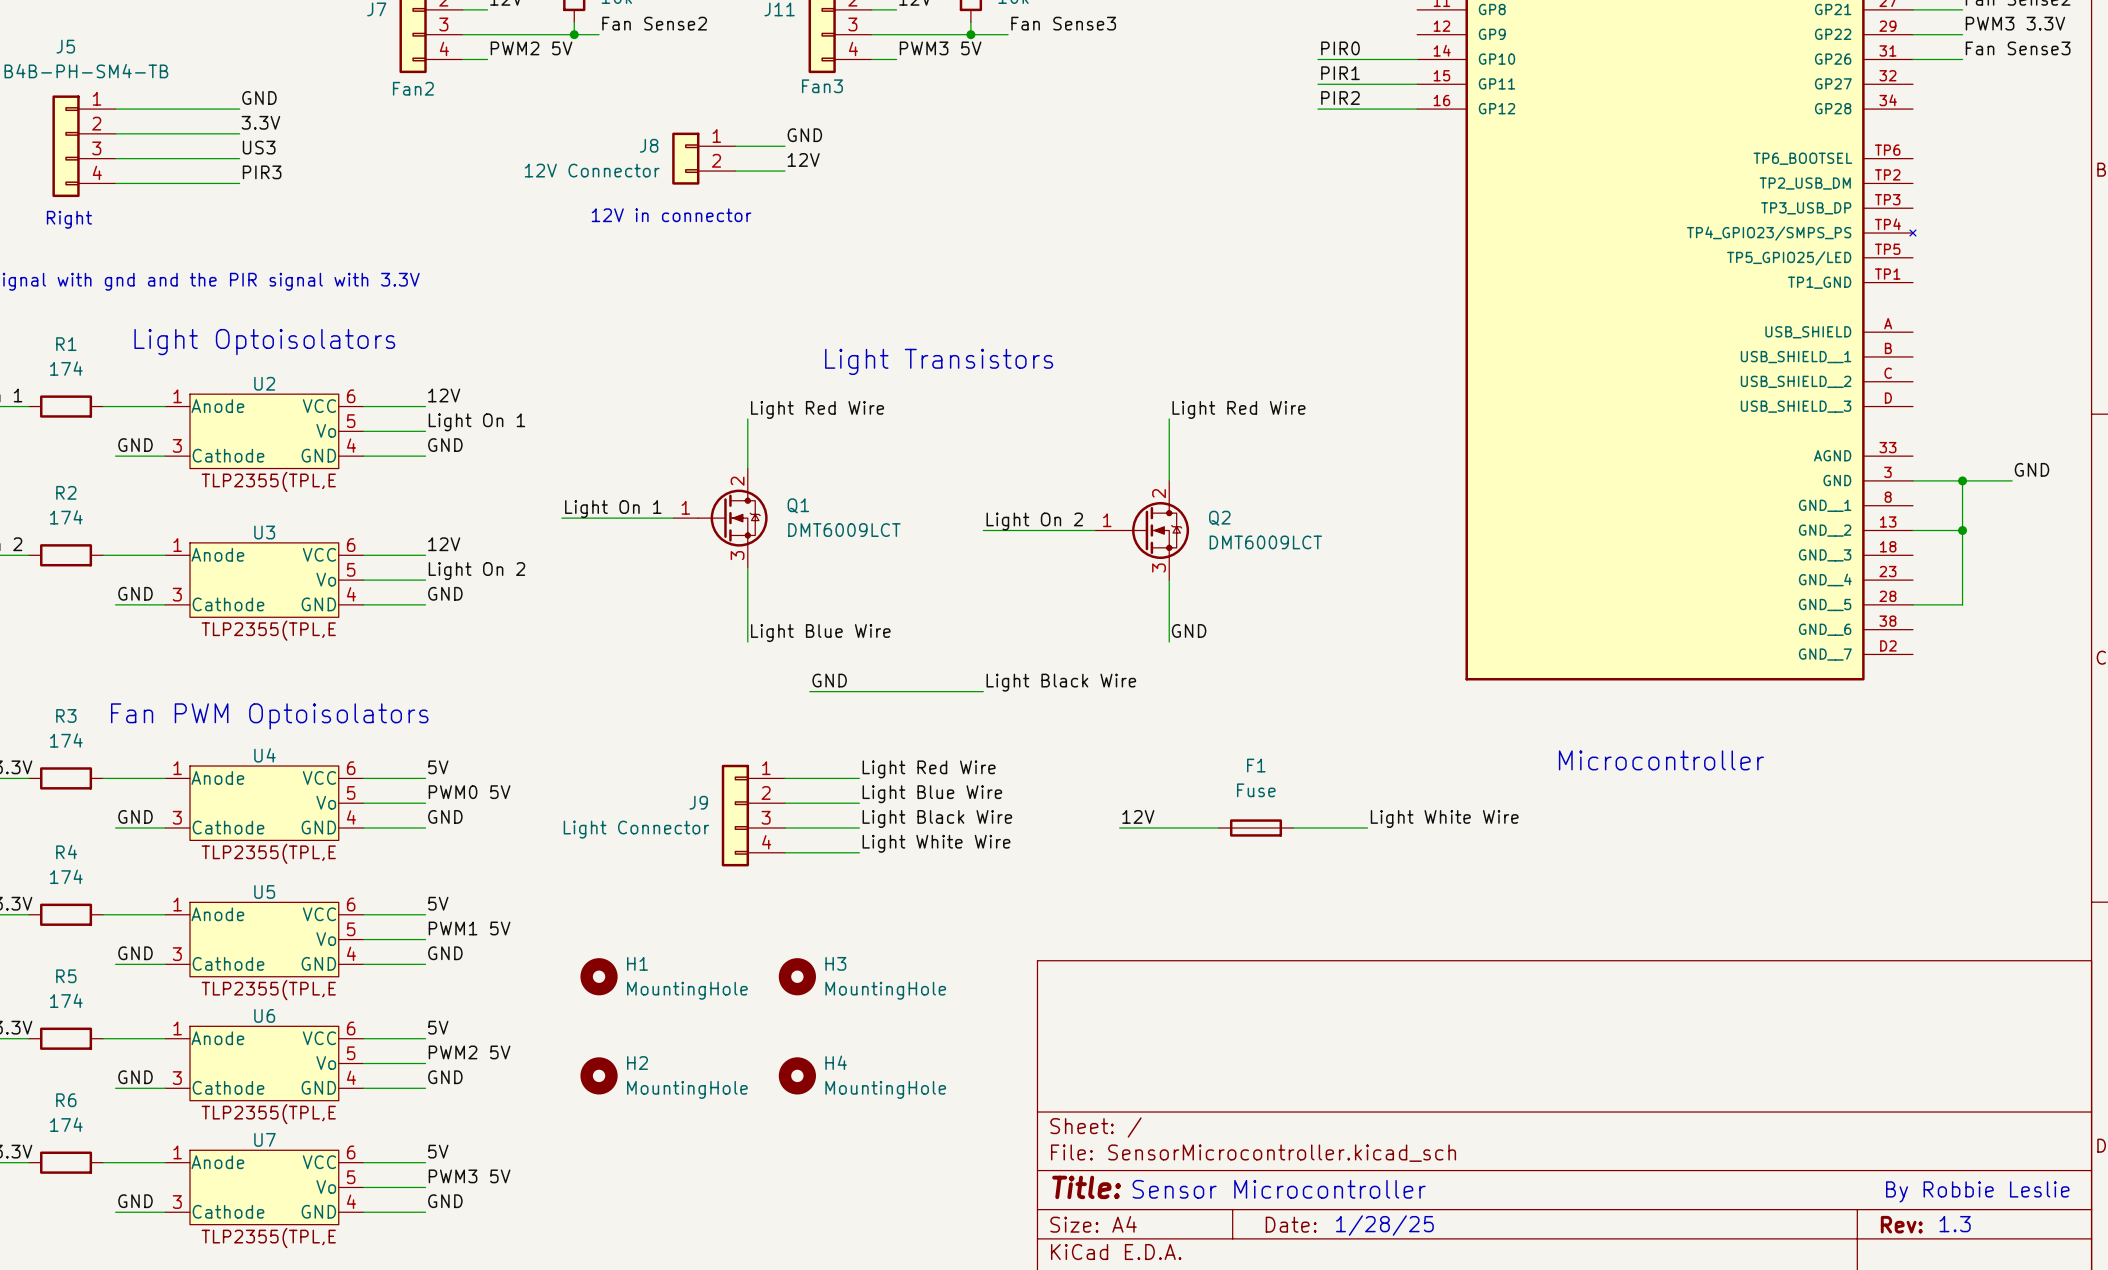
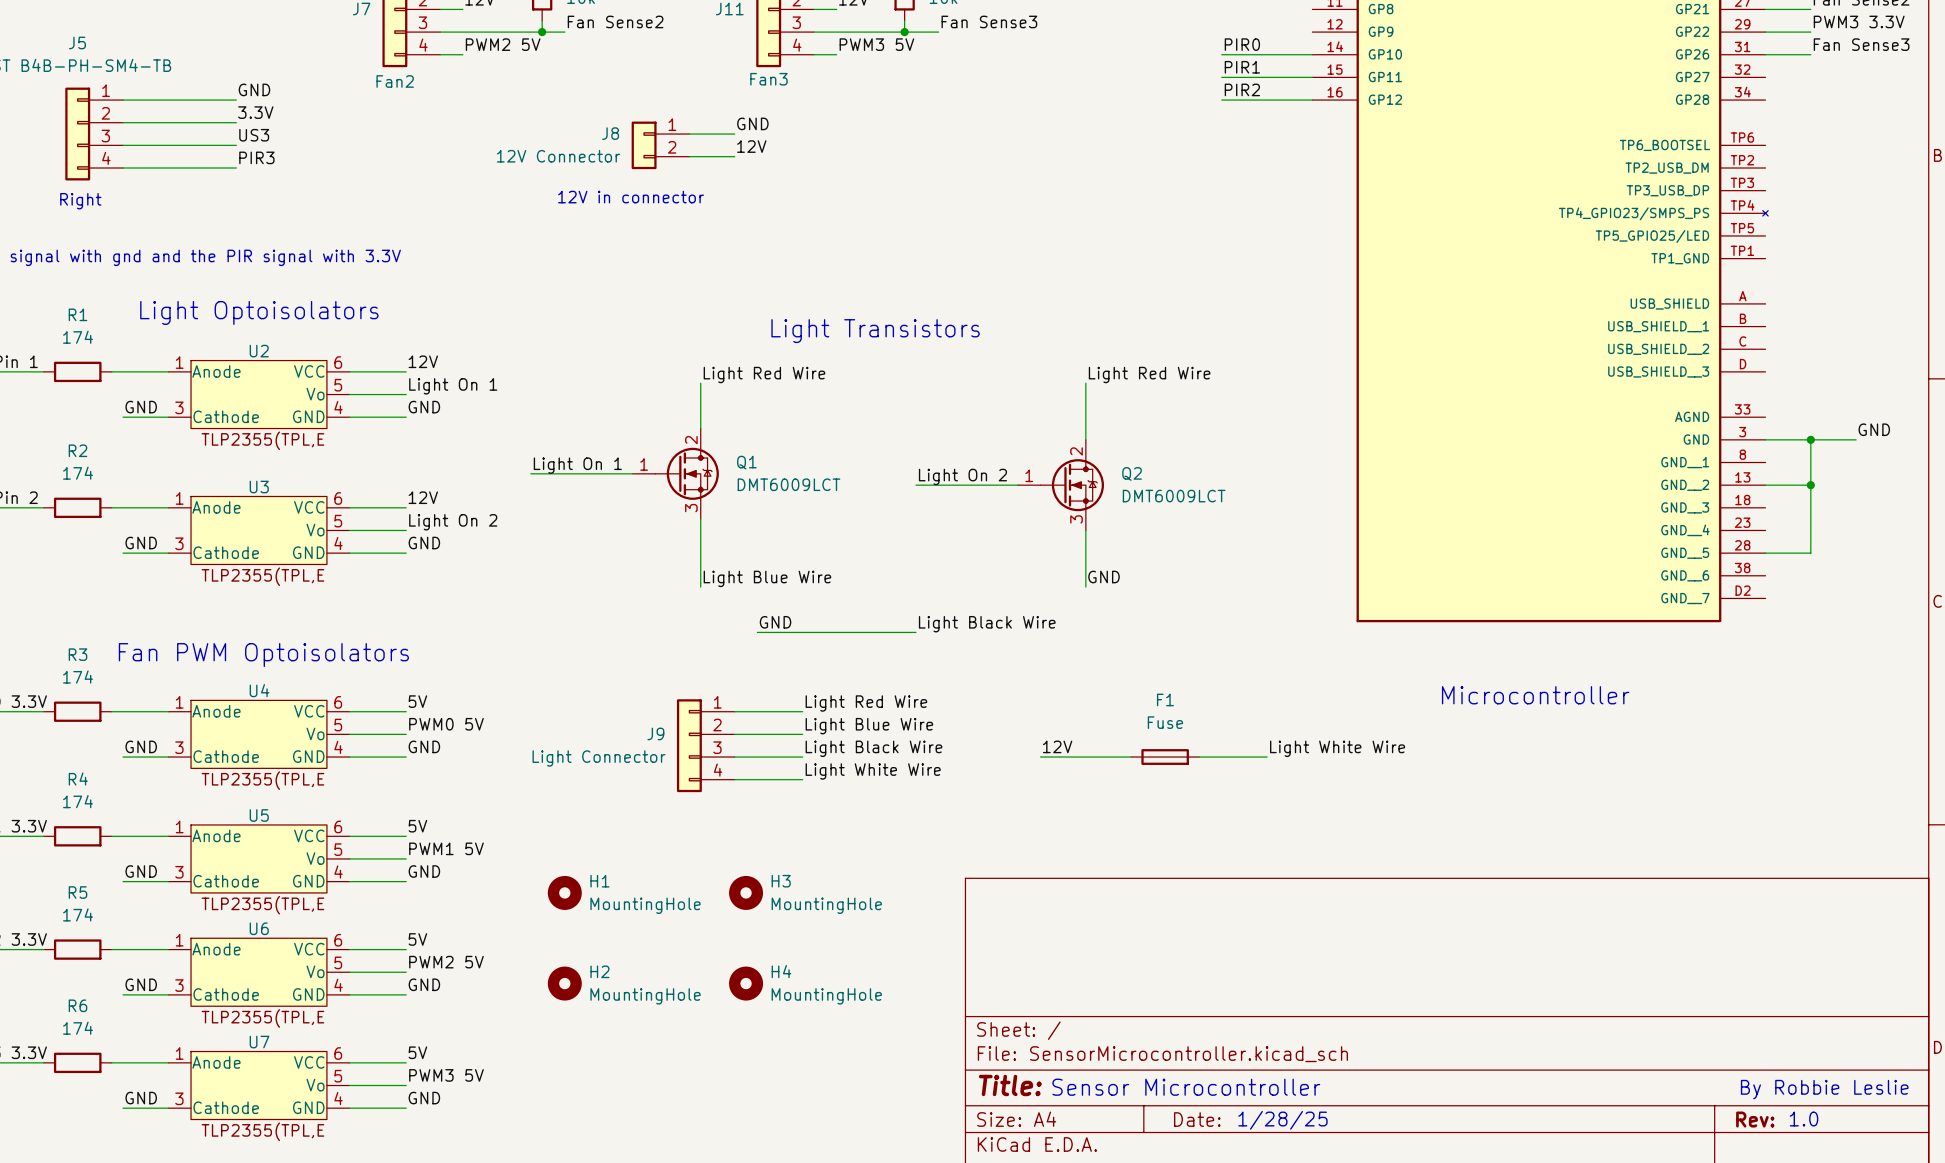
text: 1.3 (1955, 1224) -> 1.0 (1804, 1119)

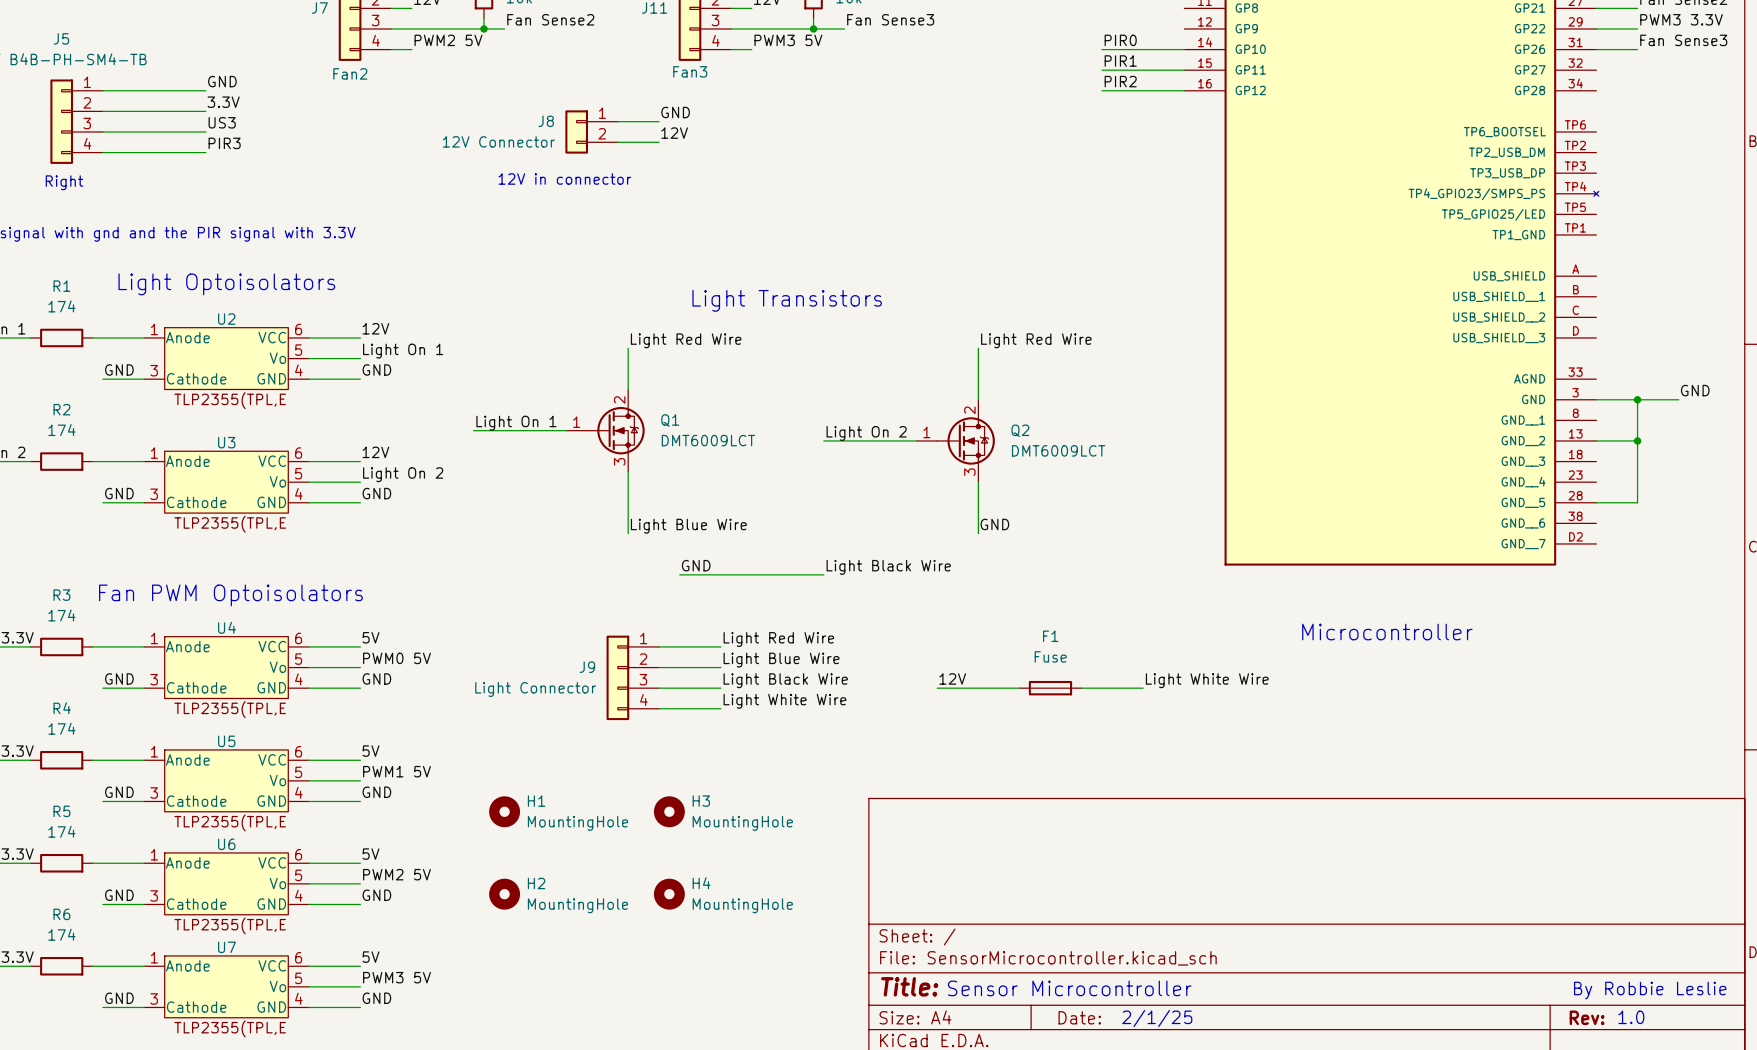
text: 1/28/25 (1282, 1120) -> 2/1/25 (1157, 1018)

